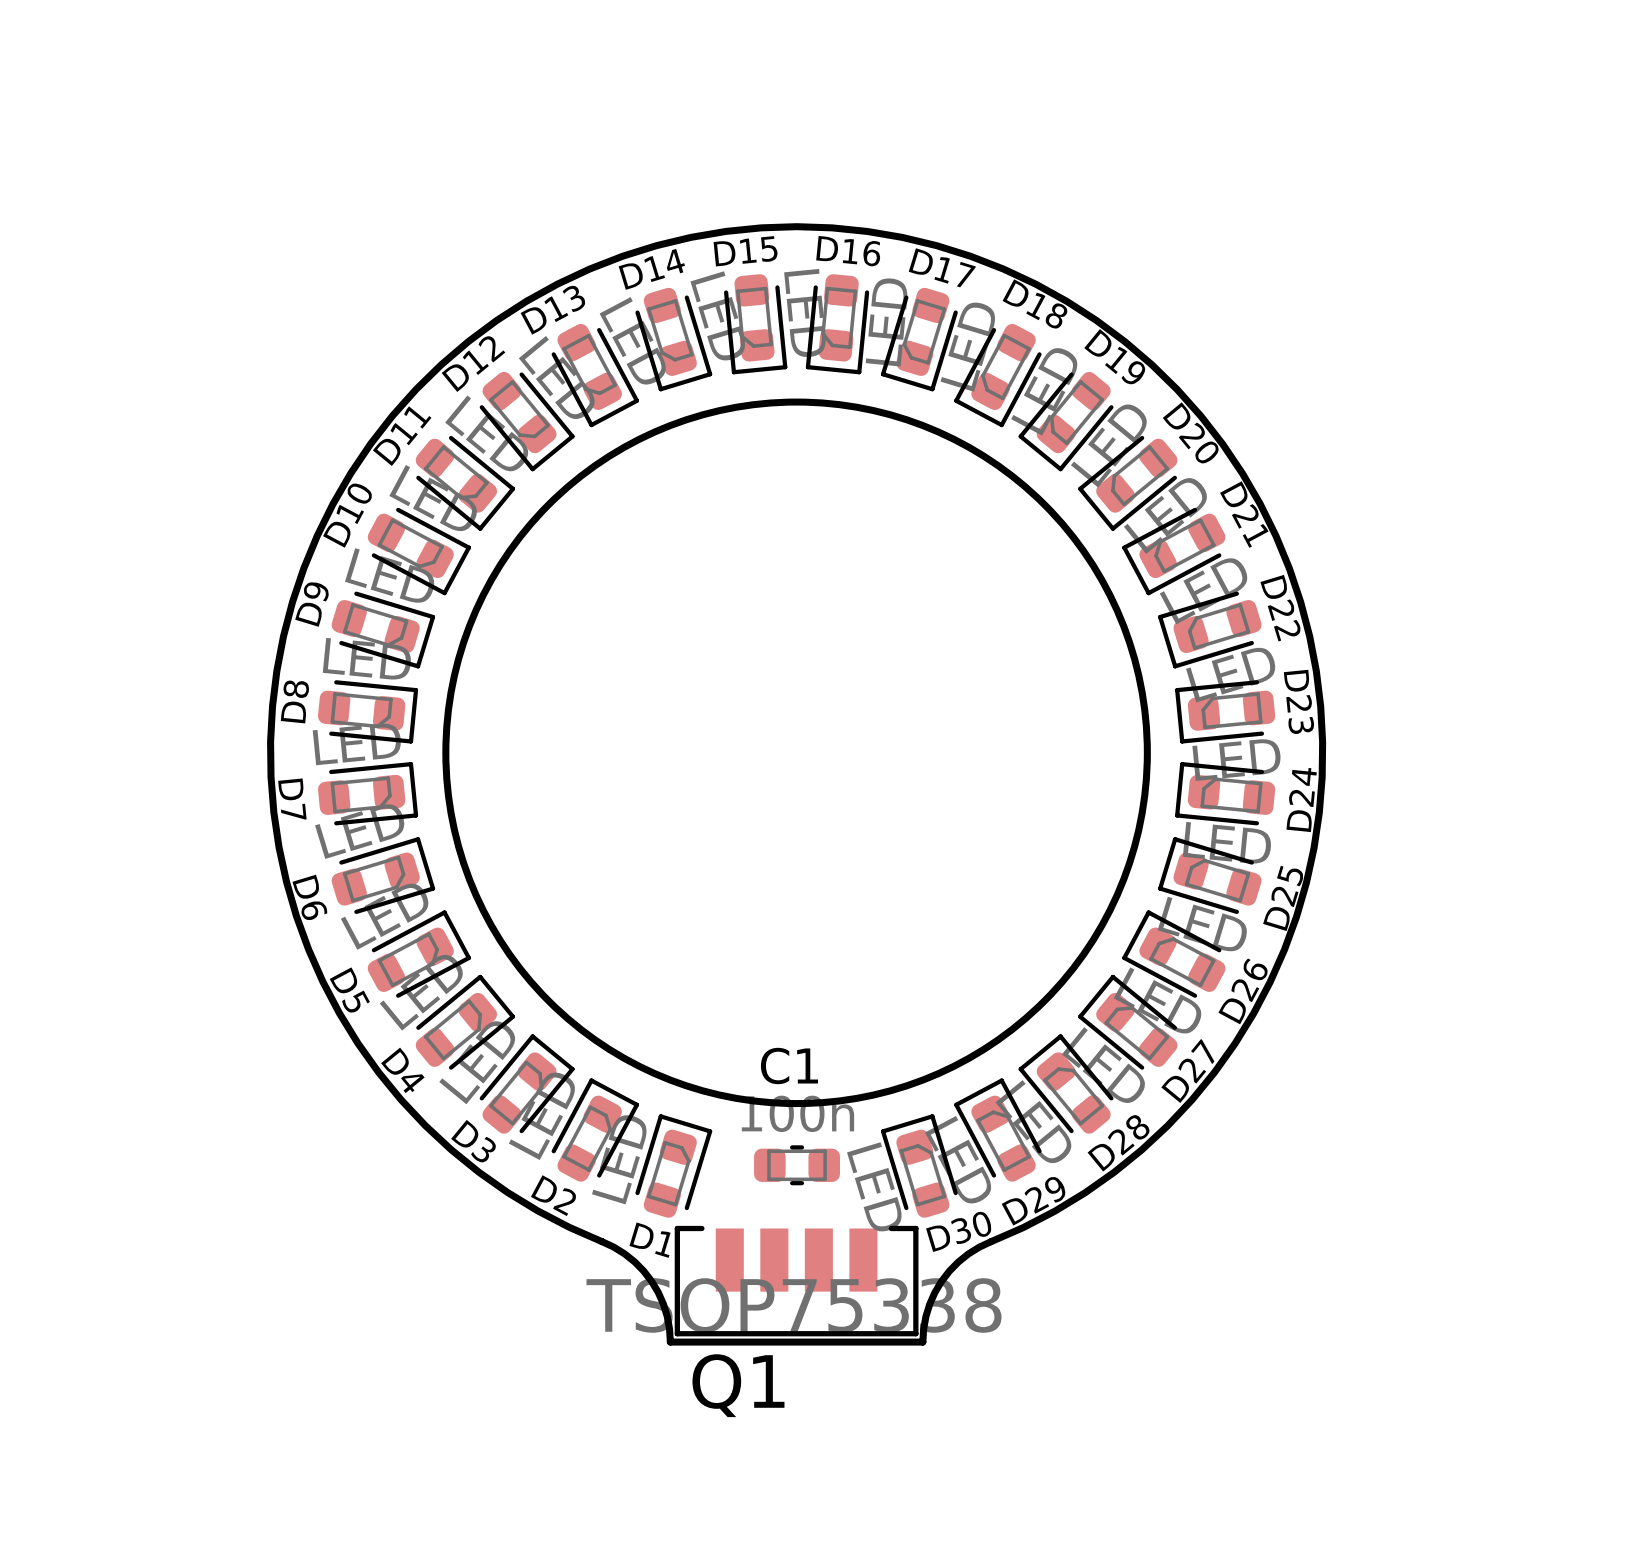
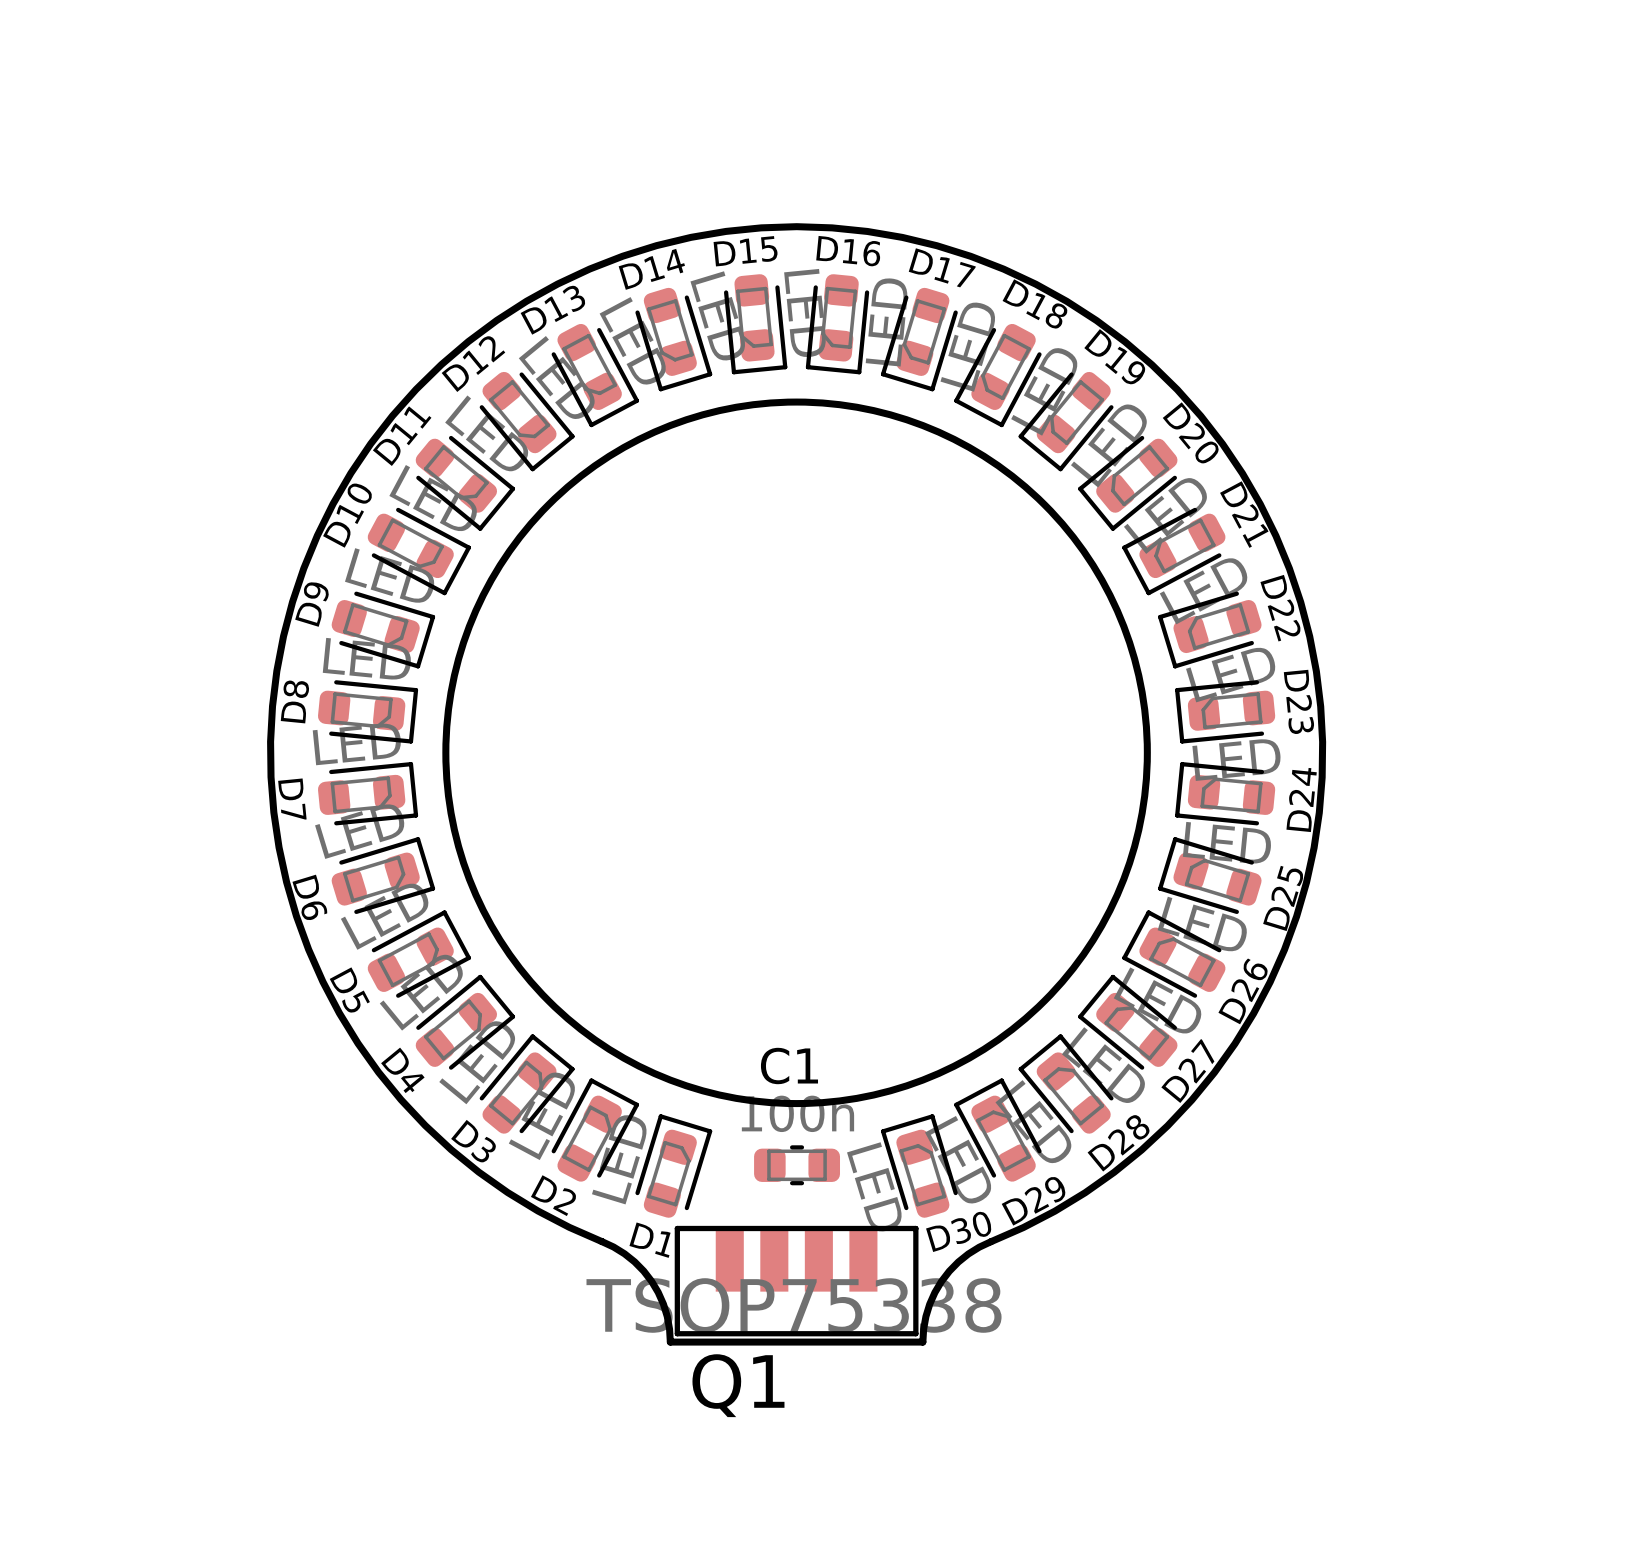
Q1 footprint: [674, 1225, 919, 1337] -> [674, 1225, 919, 1337]

